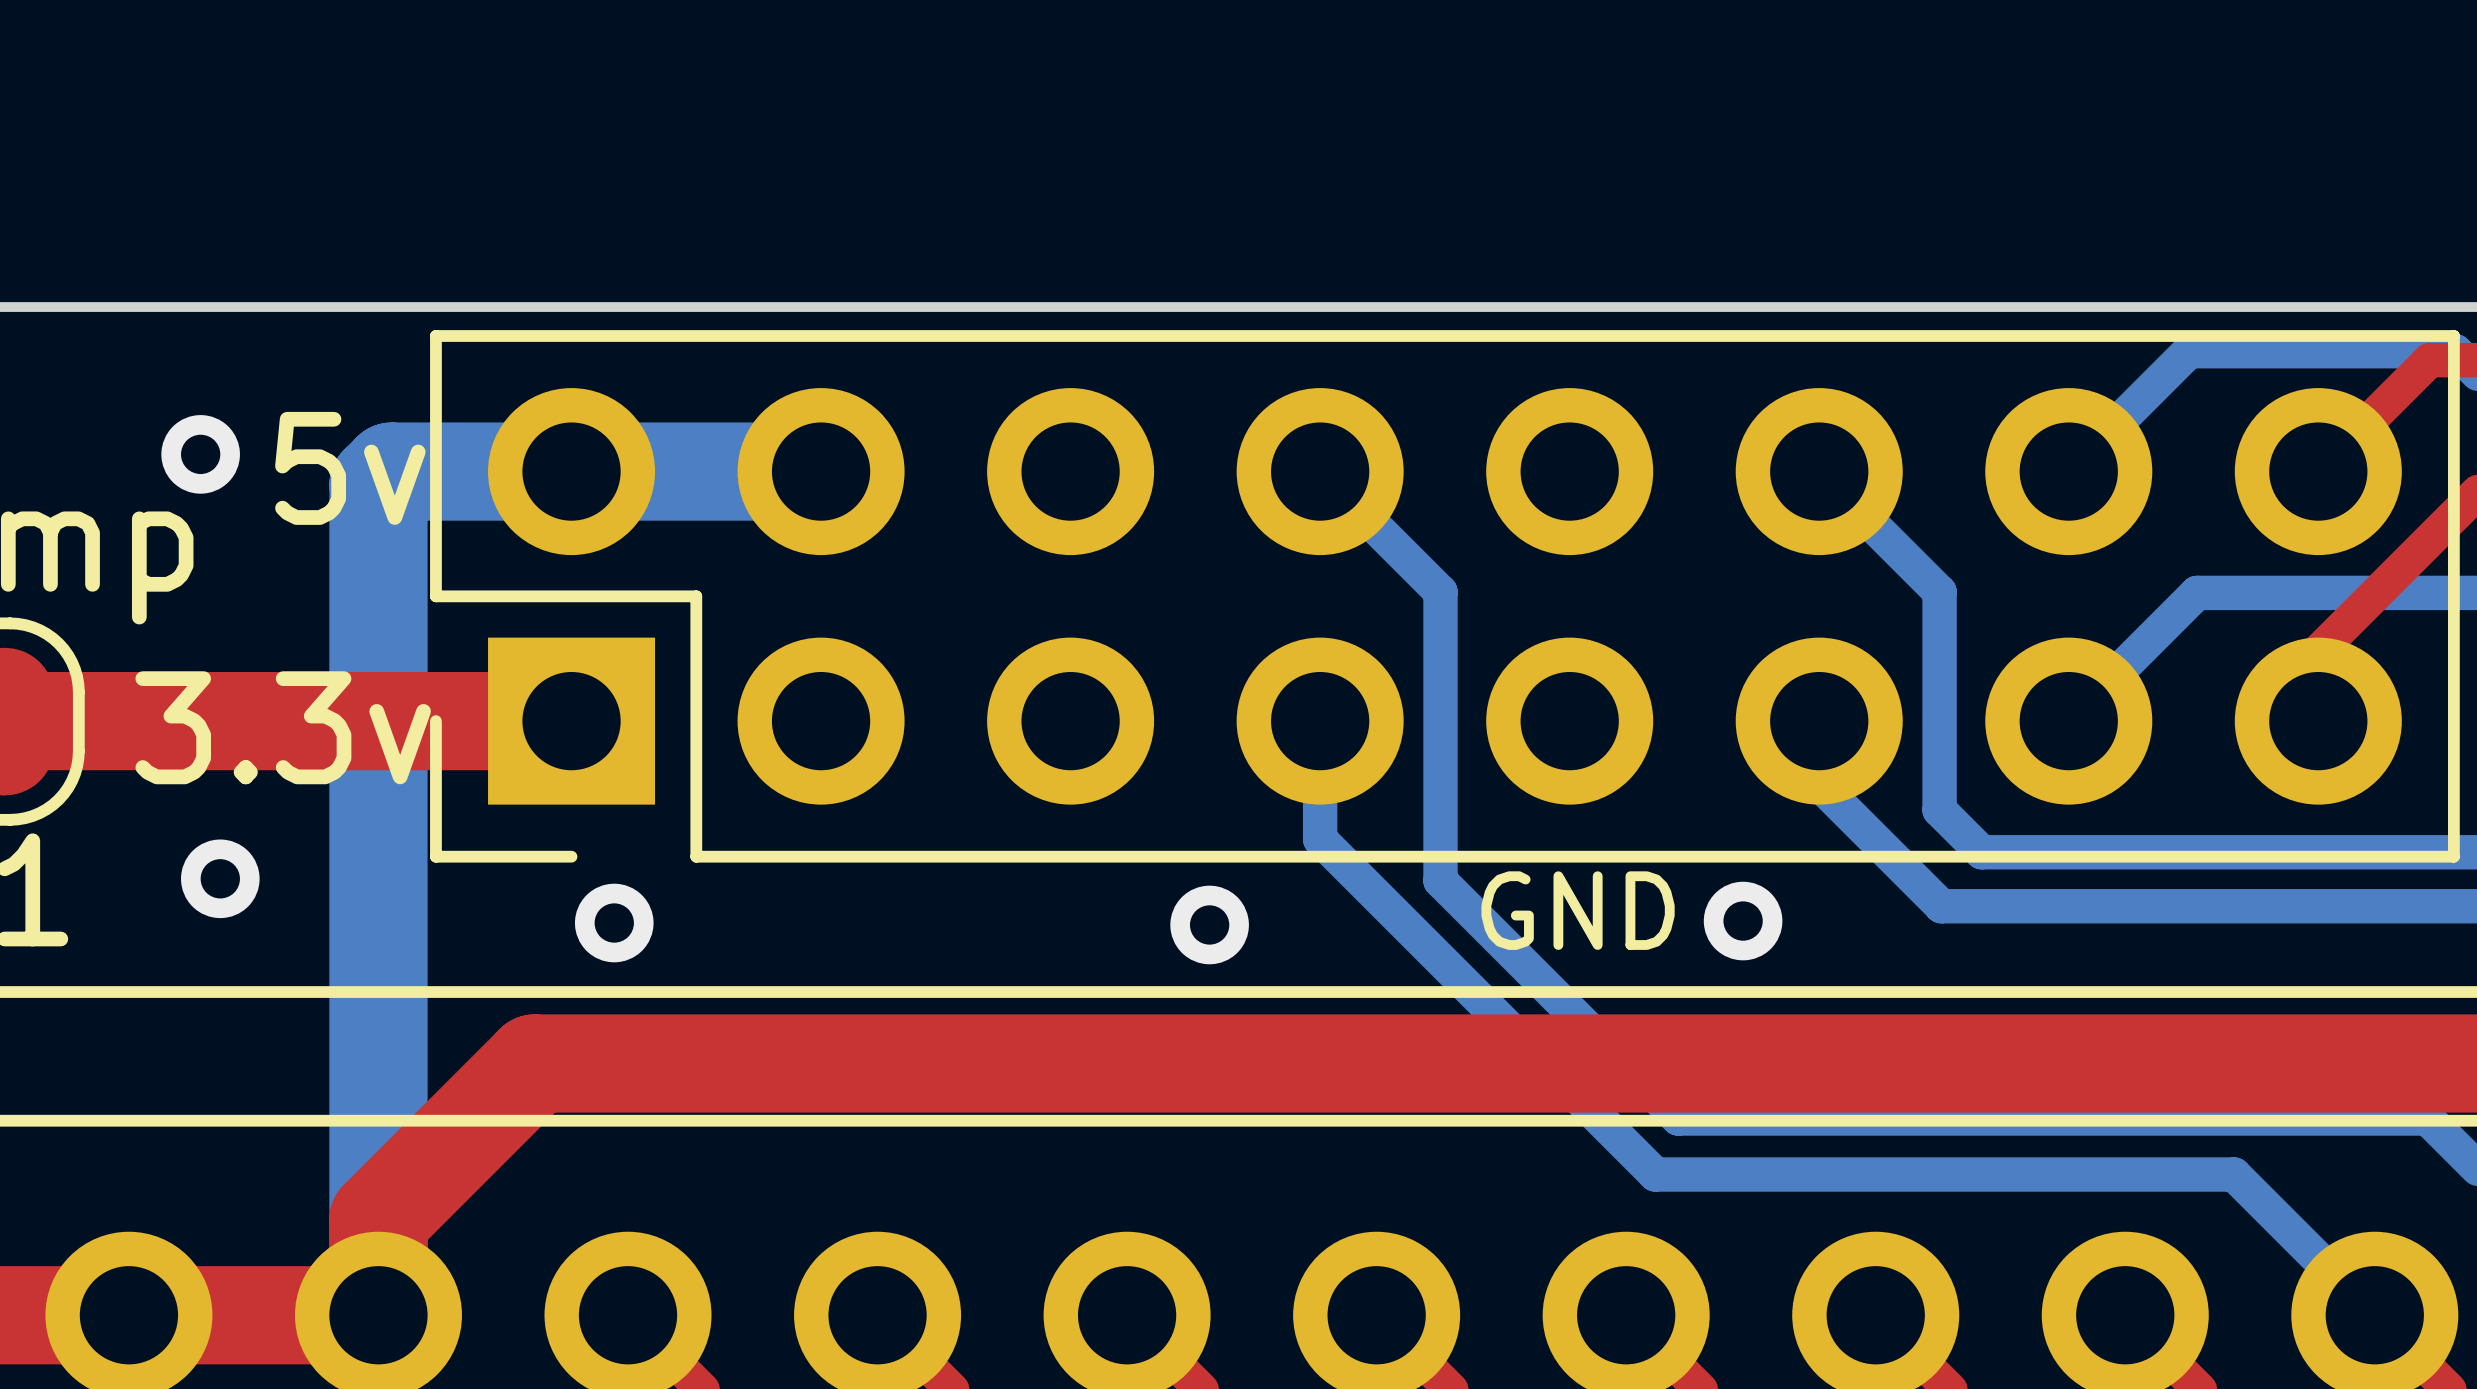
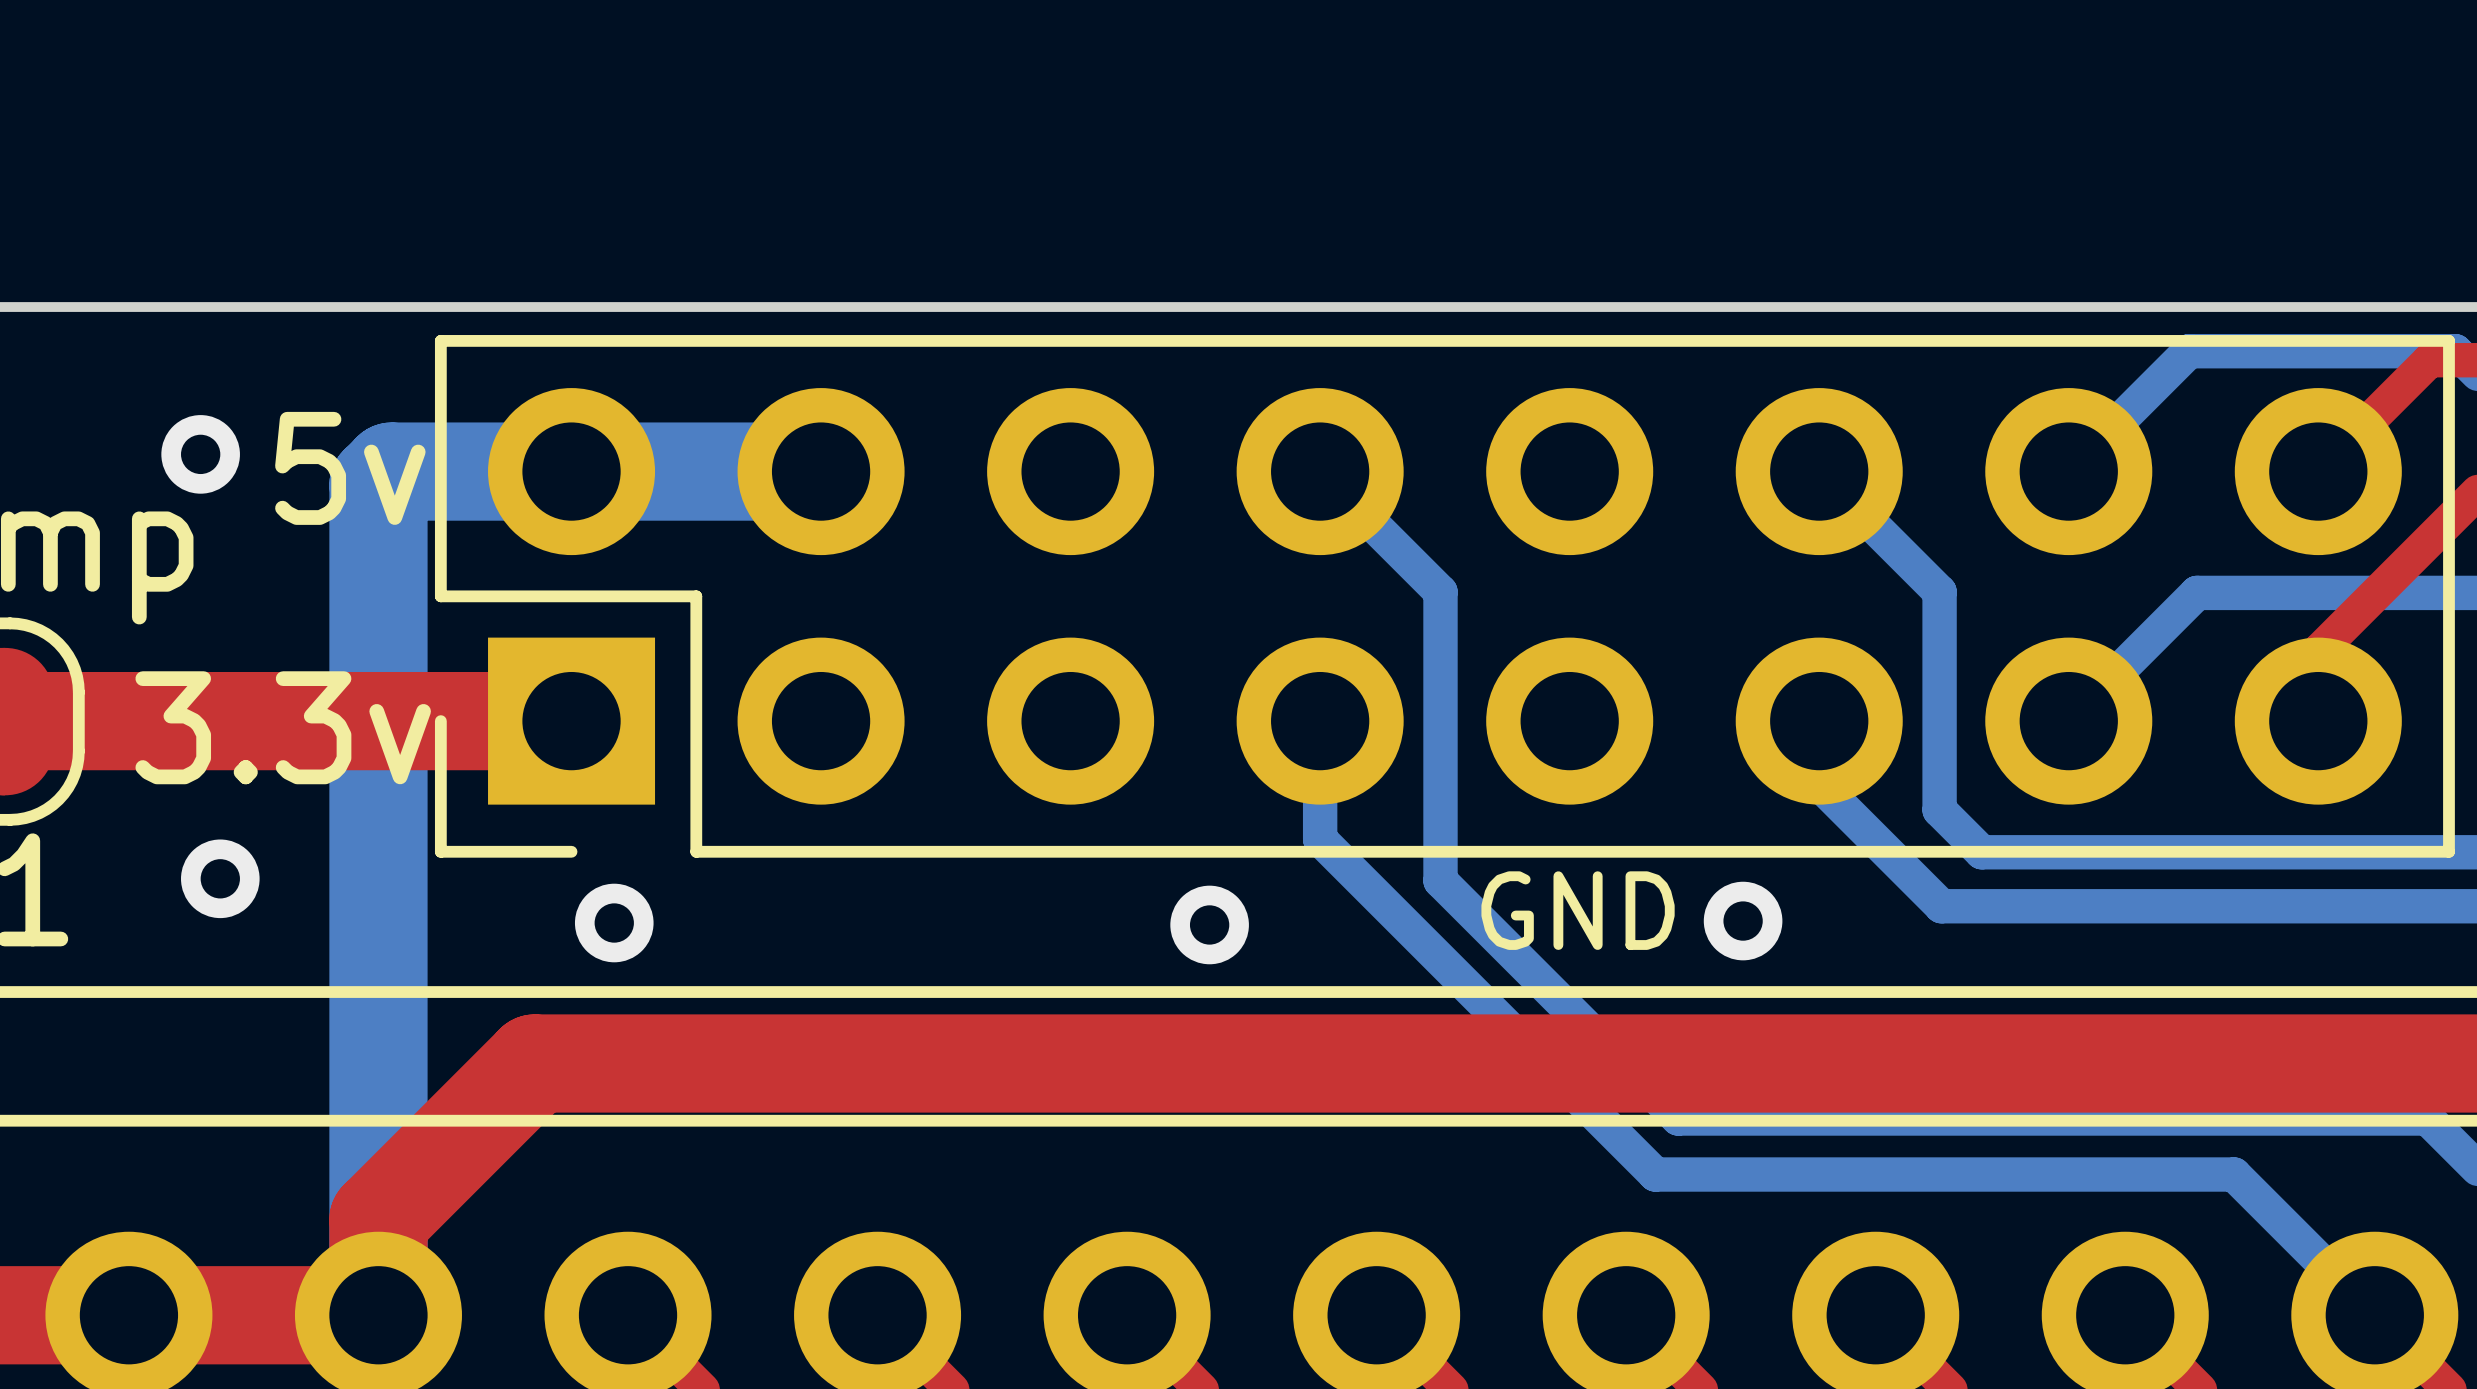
part footprint: [430, 330, 2460, 863] -> [434, 335, 2455, 858]

